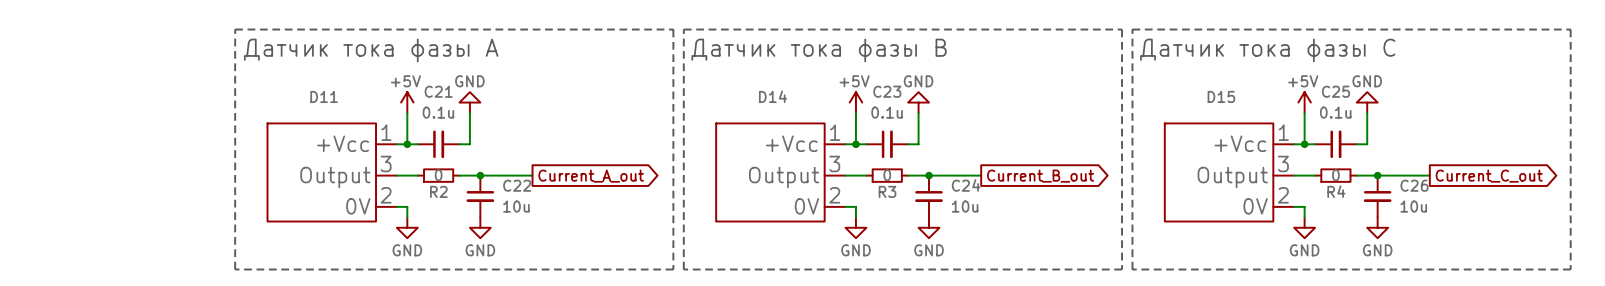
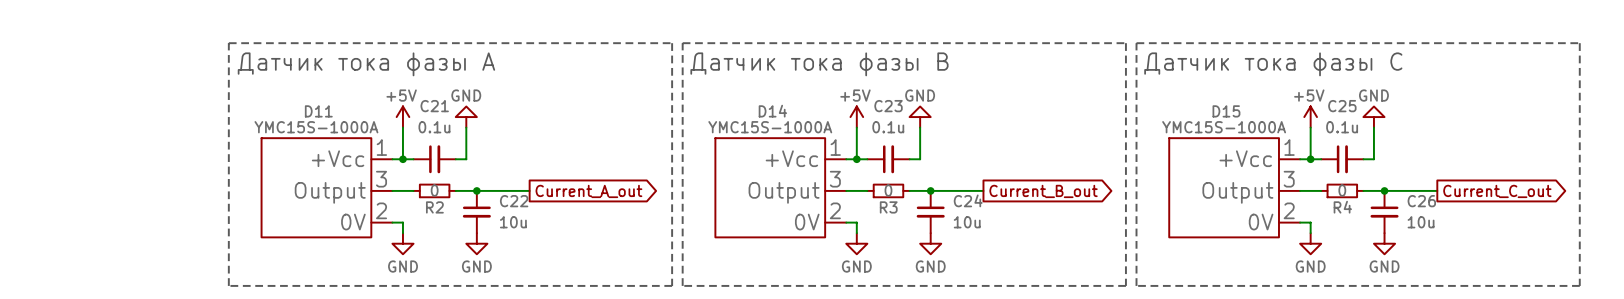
D11 value: none -> YMC15S-1000A (316, 127)
D14 value: none -> YMC15S-1000A (770, 127)
D15 value: none -> YMC15S-1000A (1224, 127)

